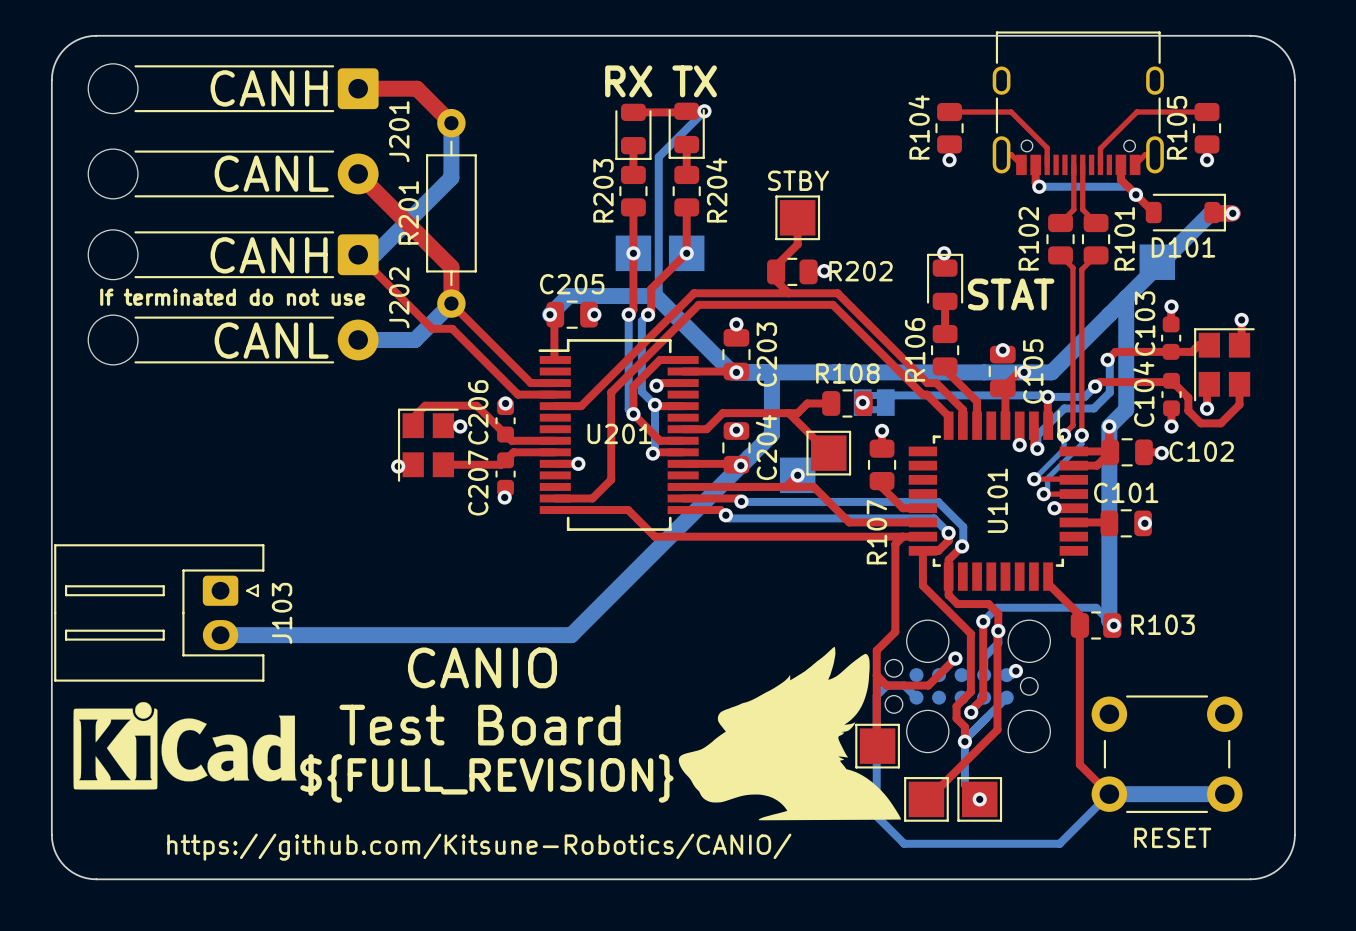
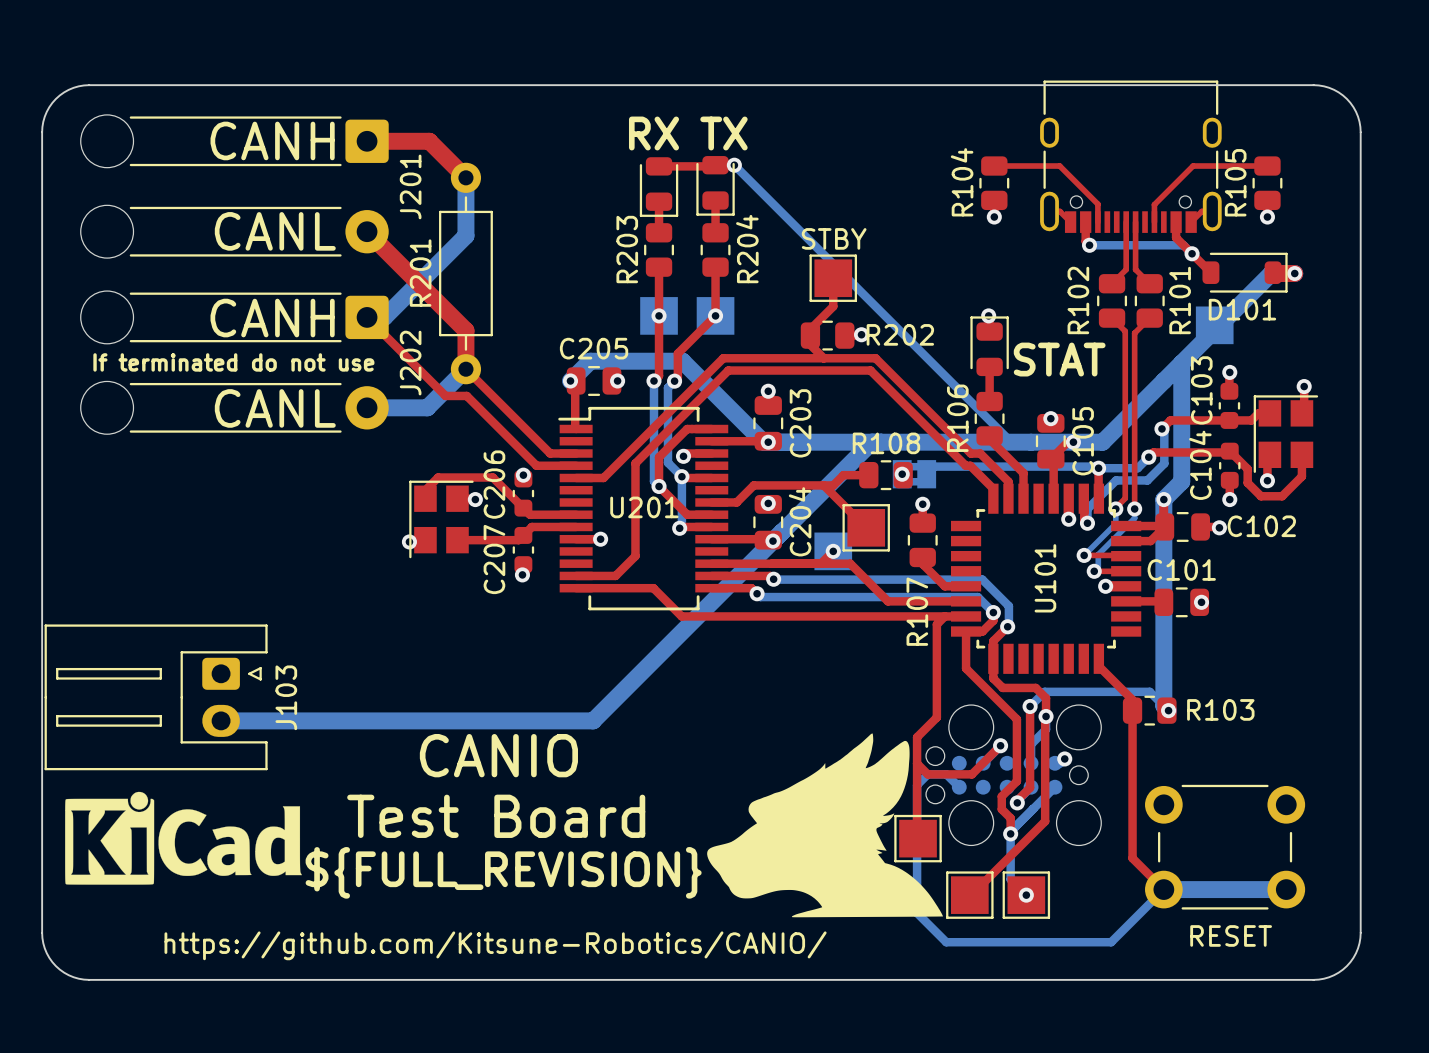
bottom track: (704, 111) (658, 156) (658, 294) (736, 372) -> (734, 165) (1011, 442)
bottom track: (771, 372) (771, 434) -> (871, 442) (805, 508)

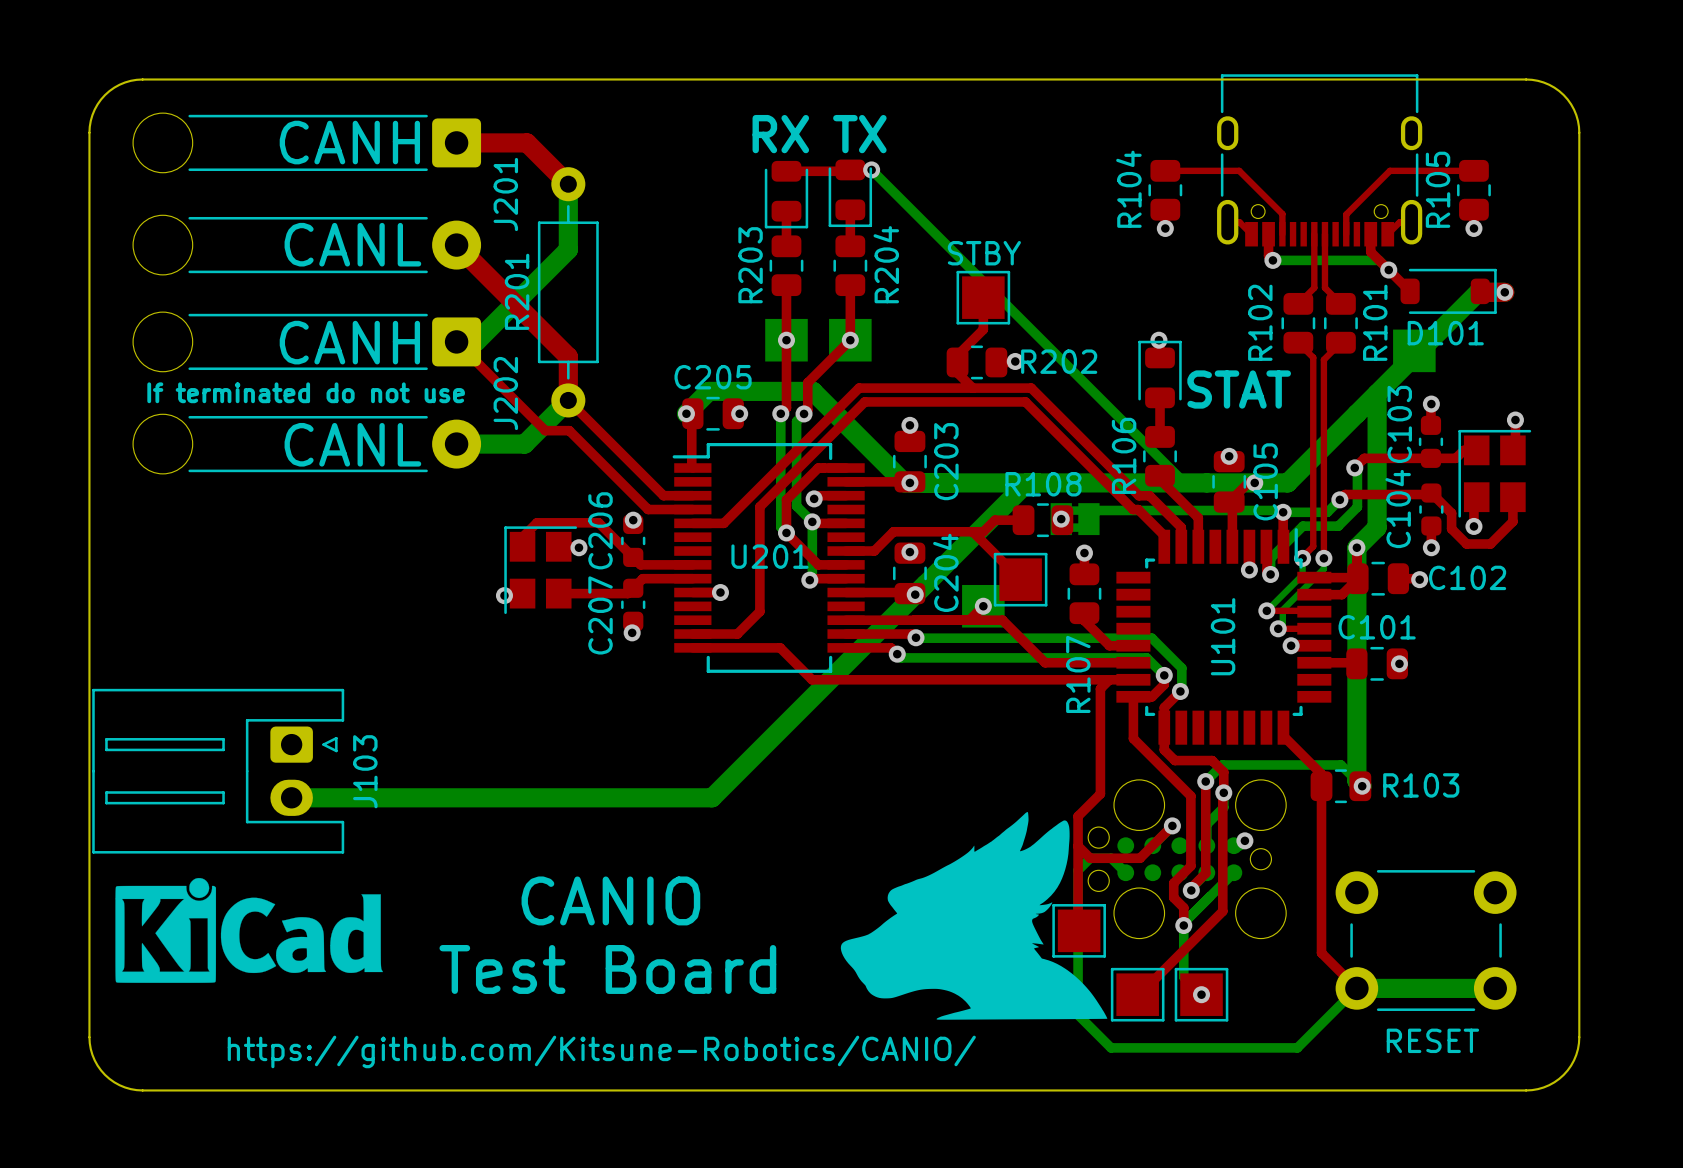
text: CANIO (498, 755) -> none
text: Test Board (496, 816) -> CANIO (610, 900)
text: ${FULL_REVISION} (503, 872) -> Test Board (607, 969)

